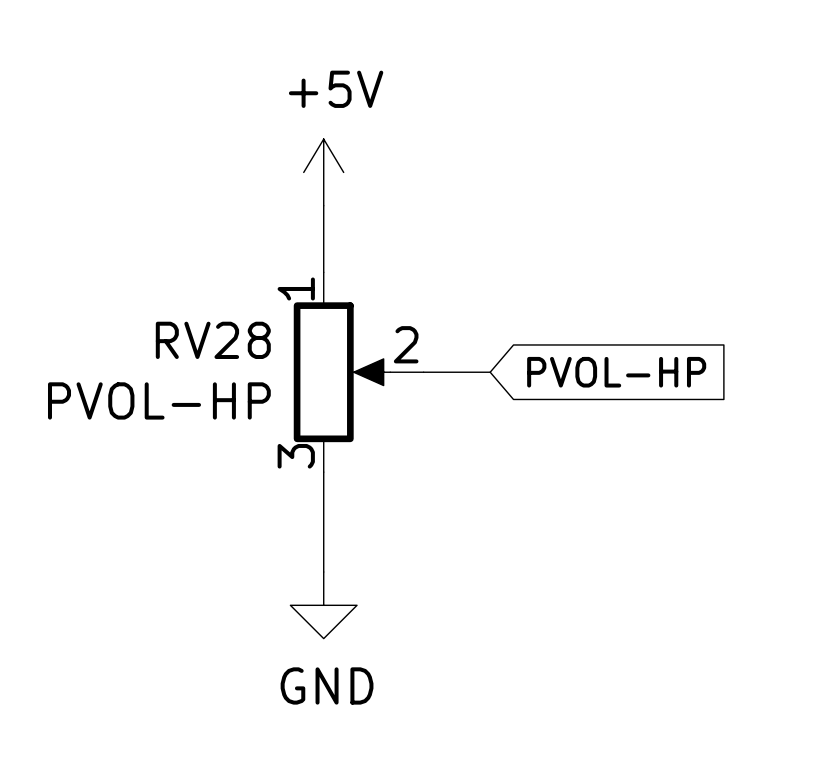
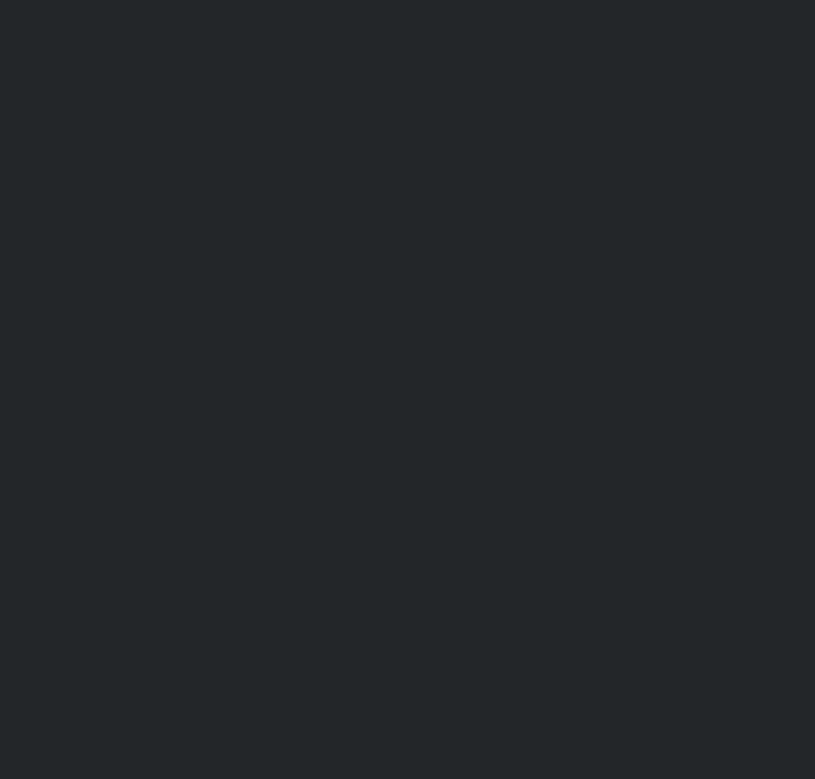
power symbol: +5V (323, 172) -> none
wire: (323, 205) (323, 272) -> none
RV28: PVOL-HP (358, 372) -> none
wire: (423, 372) (490, 372) -> none
global label: PVOL-HP (616, 372) -> none
wire: (323, 472) (323, 572) -> none
power symbol: GND (323, 605) -> none

